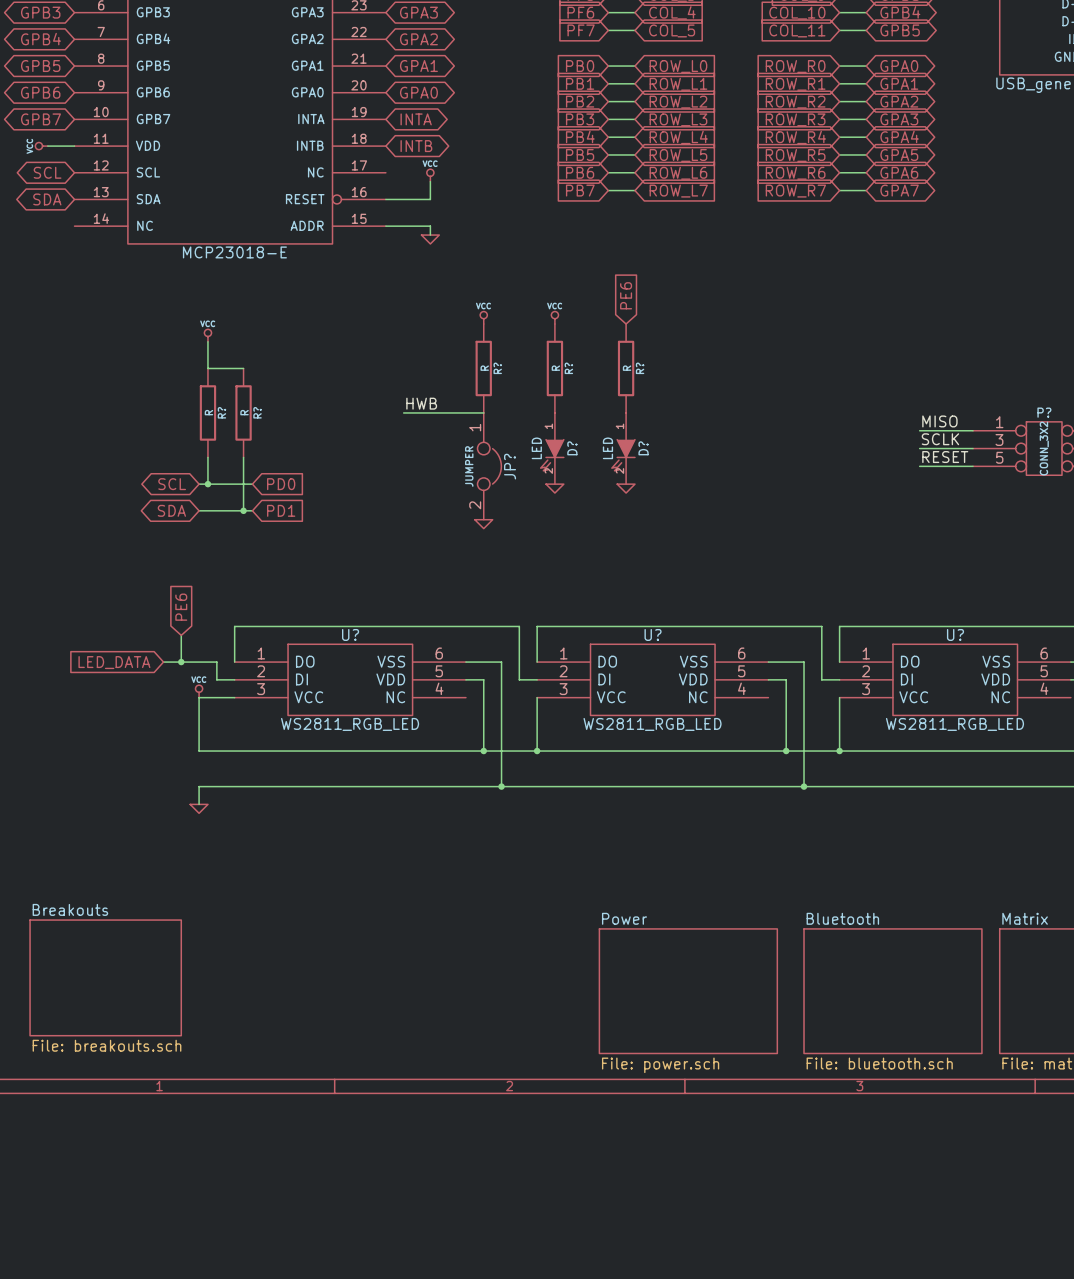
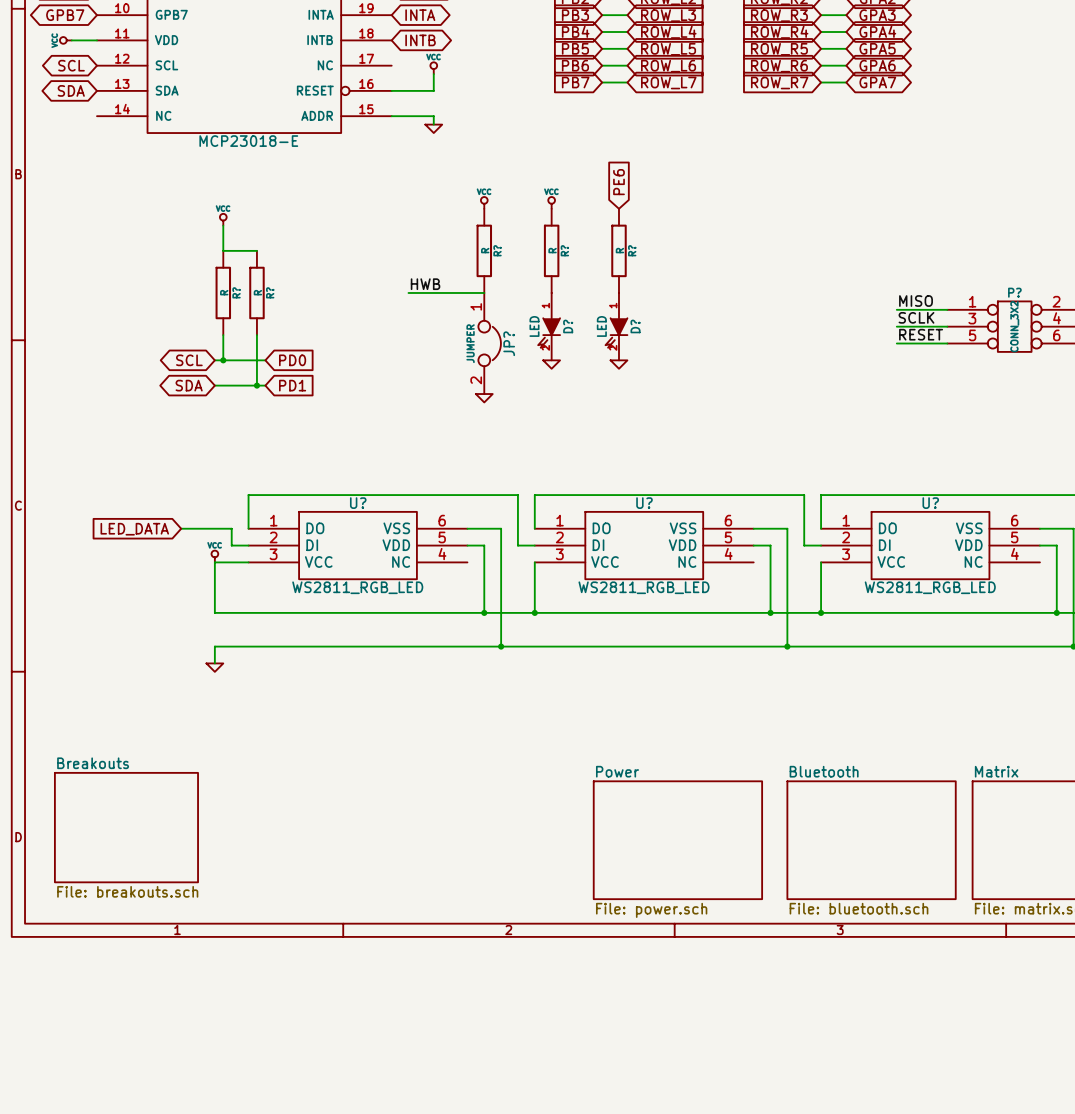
global label: PE6 (181, 607) -> none
wire: (181, 635) (181, 662) -> none
junction: (181, 662) -> none

